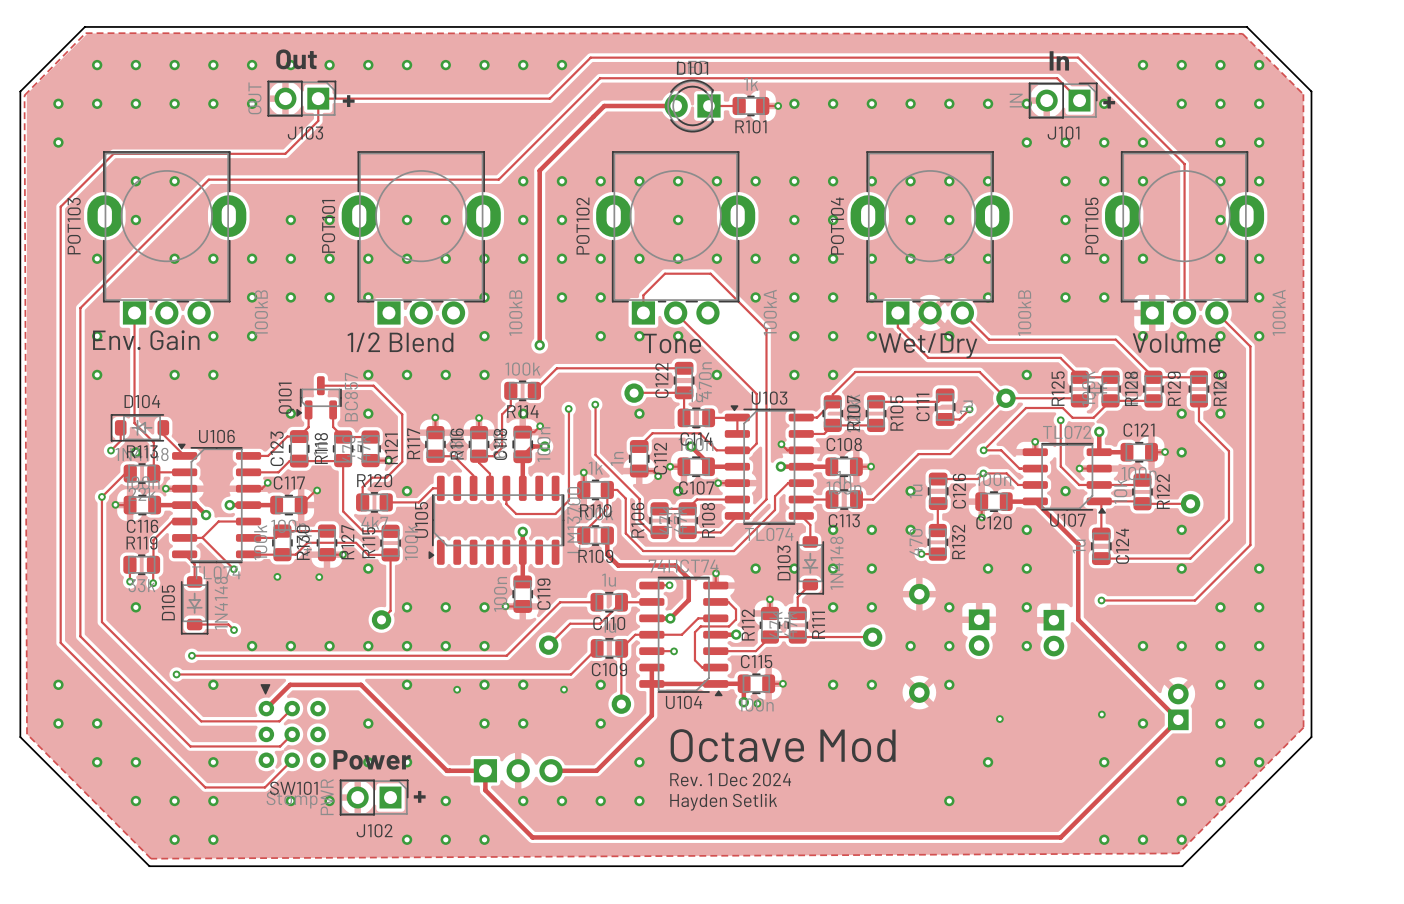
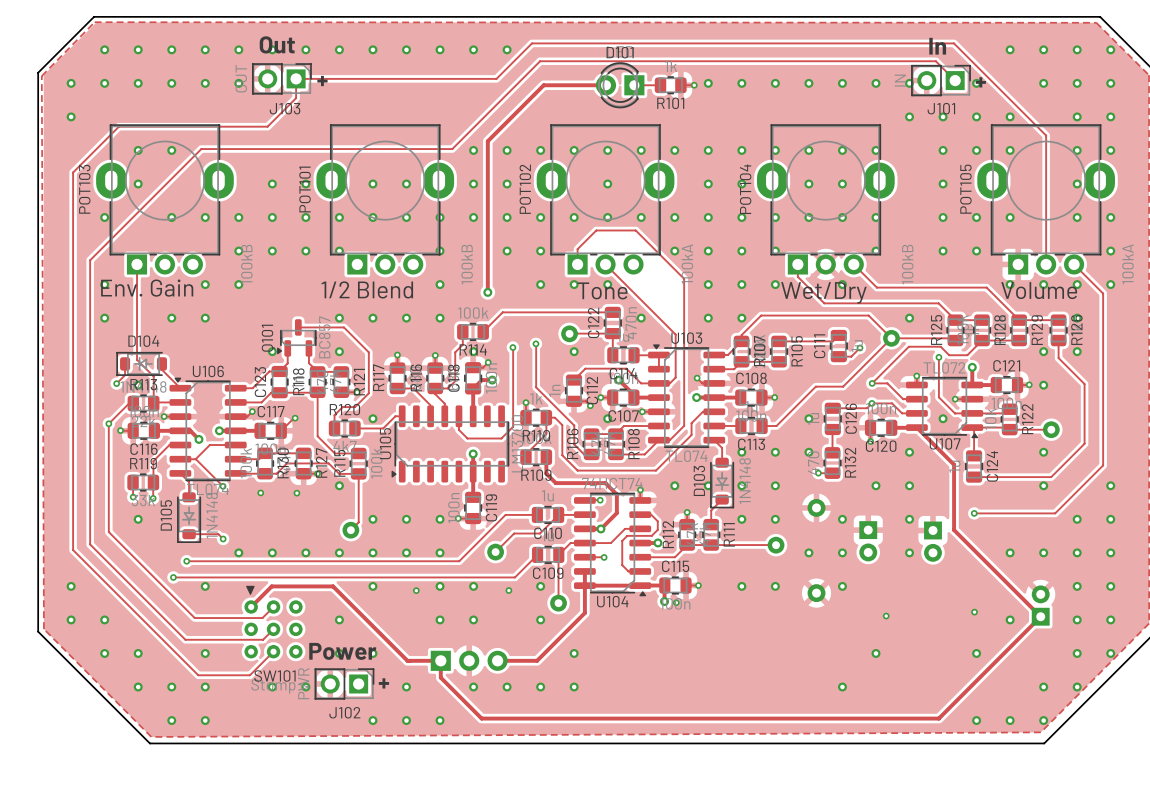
text: Octave Mod (783, 745) -> none
text: Rev. 1 Dec 2024 (730, 779) -> none
text: Hayden Setlik (723, 802) -> none

